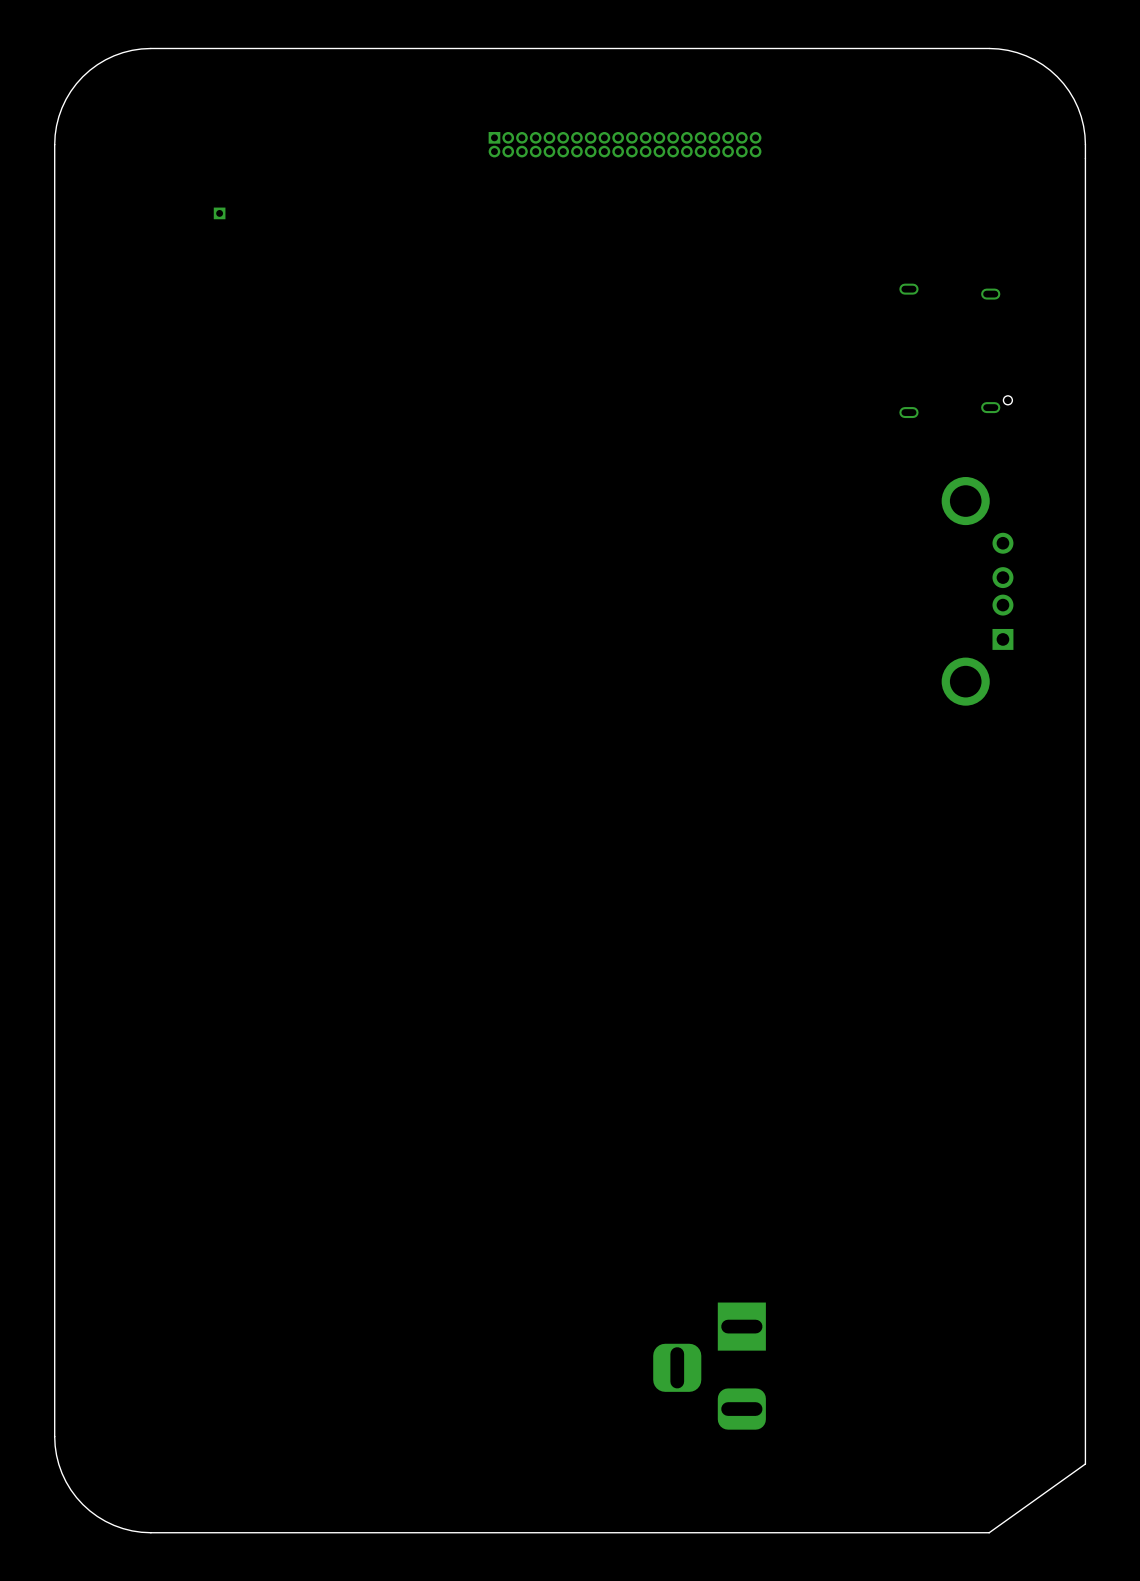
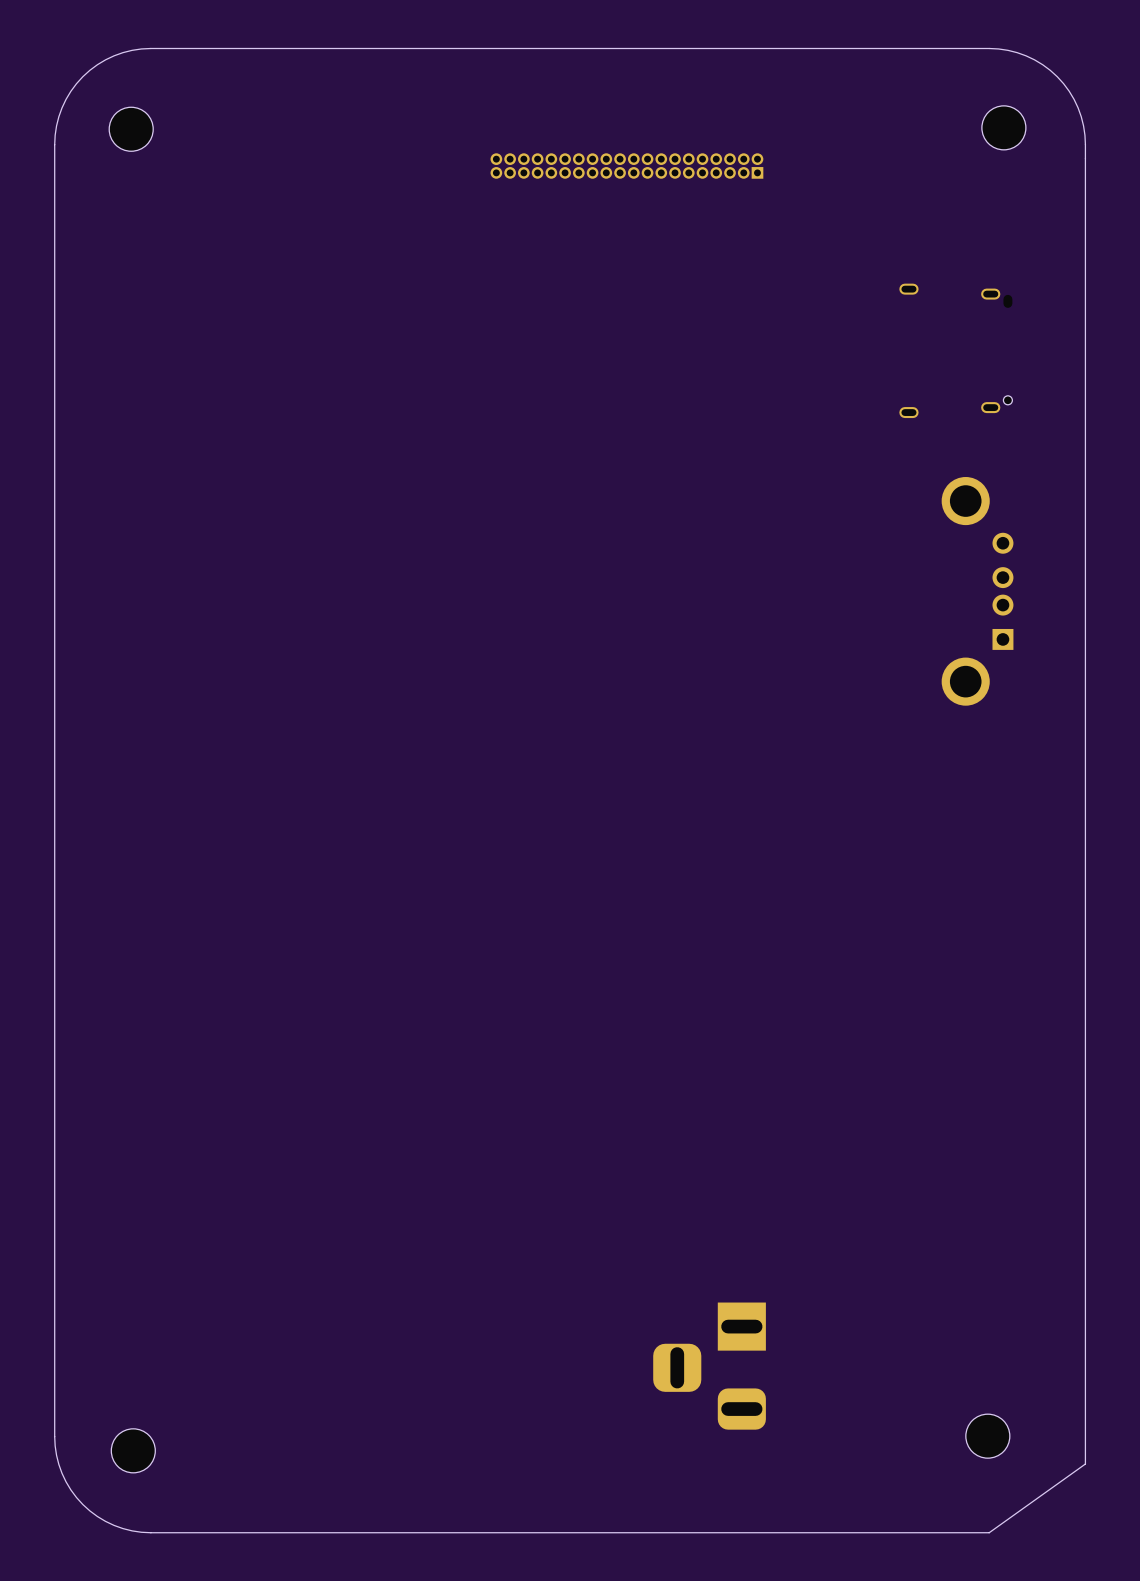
part: none -> (1003, 127)
part: none -> (131, 129)
part rotation: 0° (625, 144) -> 180° (626, 166)
part: (219, 213) -> none
part: none -> (987, 1436)
part: none -> (133, 1450)

